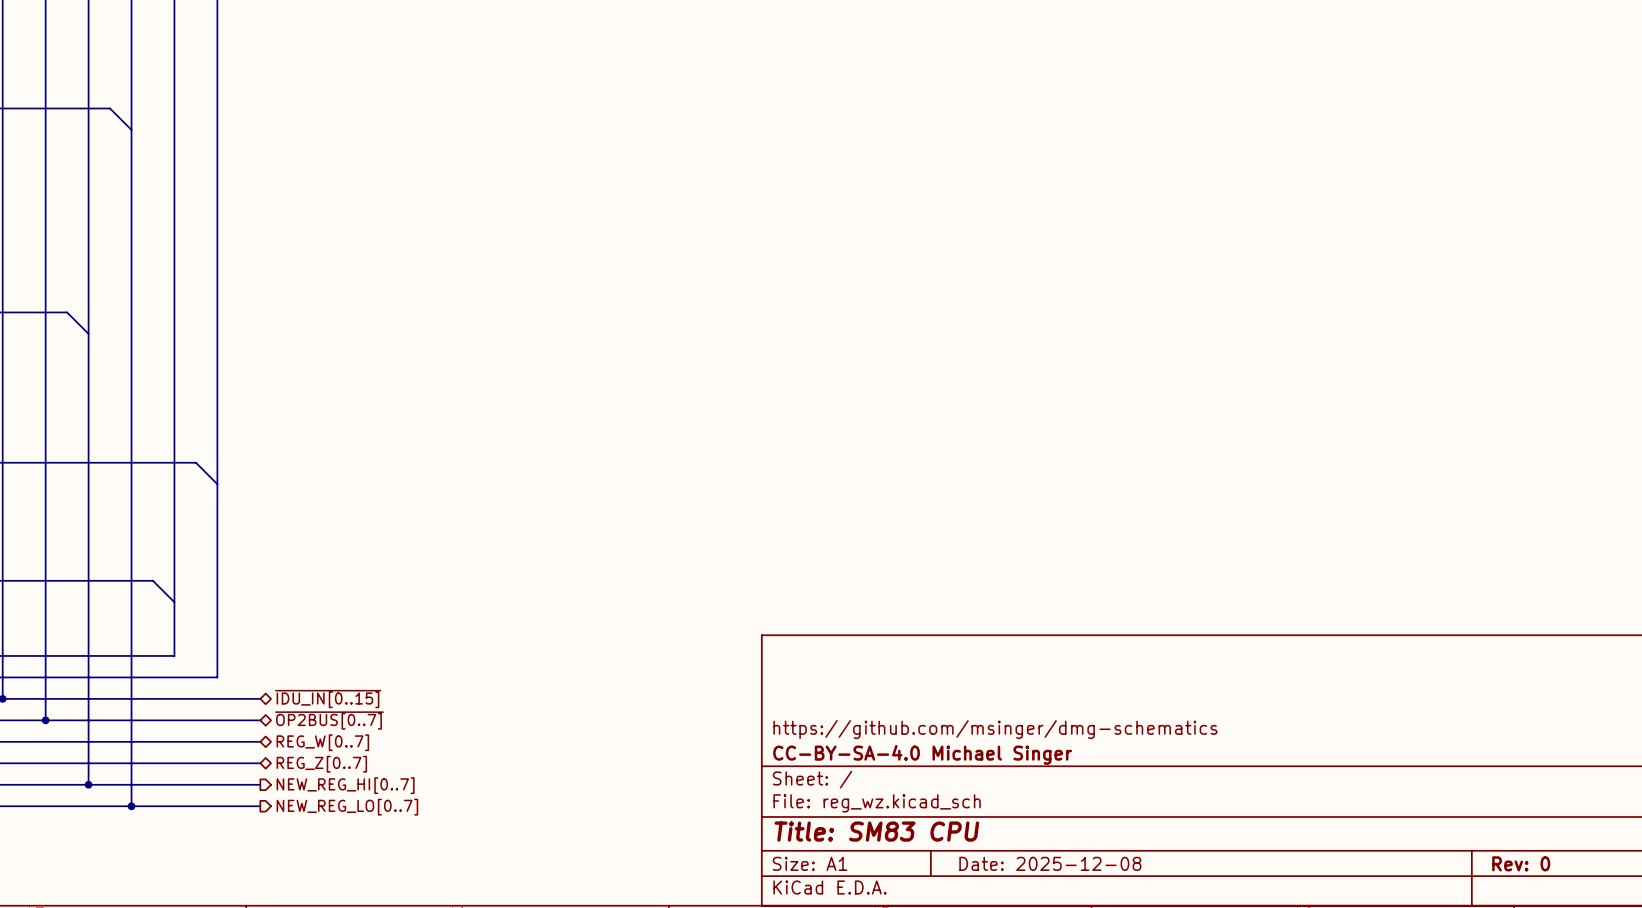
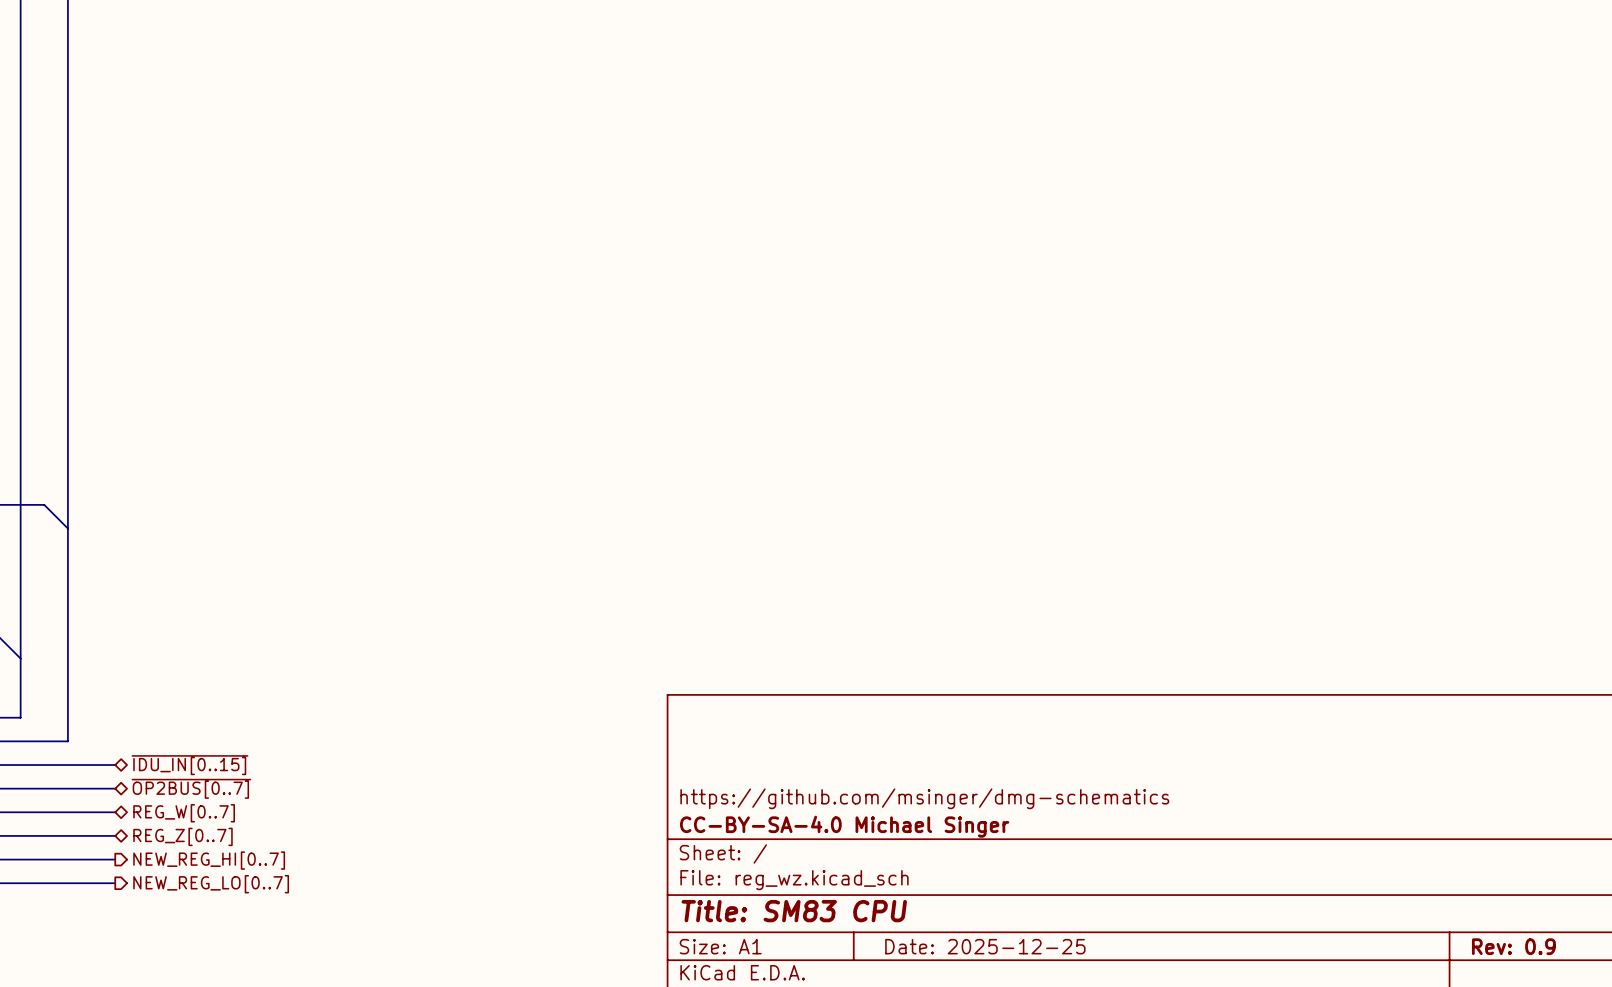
title block: Date: 2025-12-08 (1050, 863) -> Date: 2025-12-25 (985, 946)
title block: Rev: 0 (1521, 863) -> Rev: 0.9 (1513, 946)

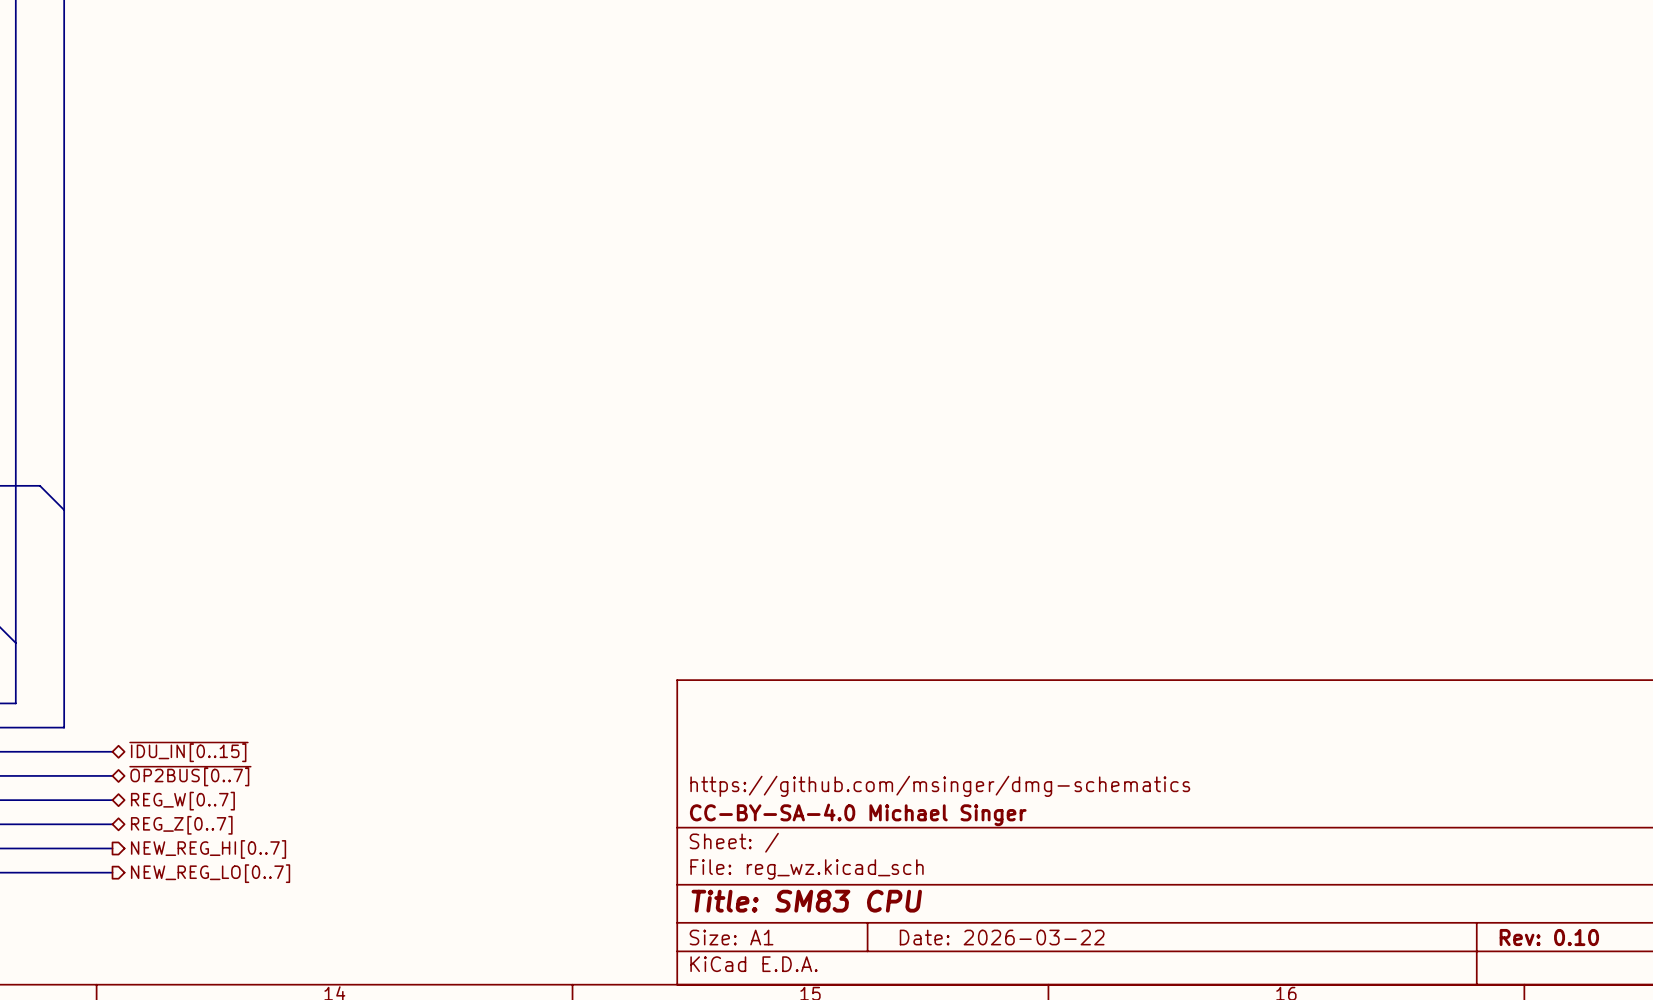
title block: Date: 2025-12-25 (985, 946) -> Date: 2026-03-22 (1002, 937)
title block: Rev: 0.9 (1513, 946) -> Rev: 0.10 (1549, 937)

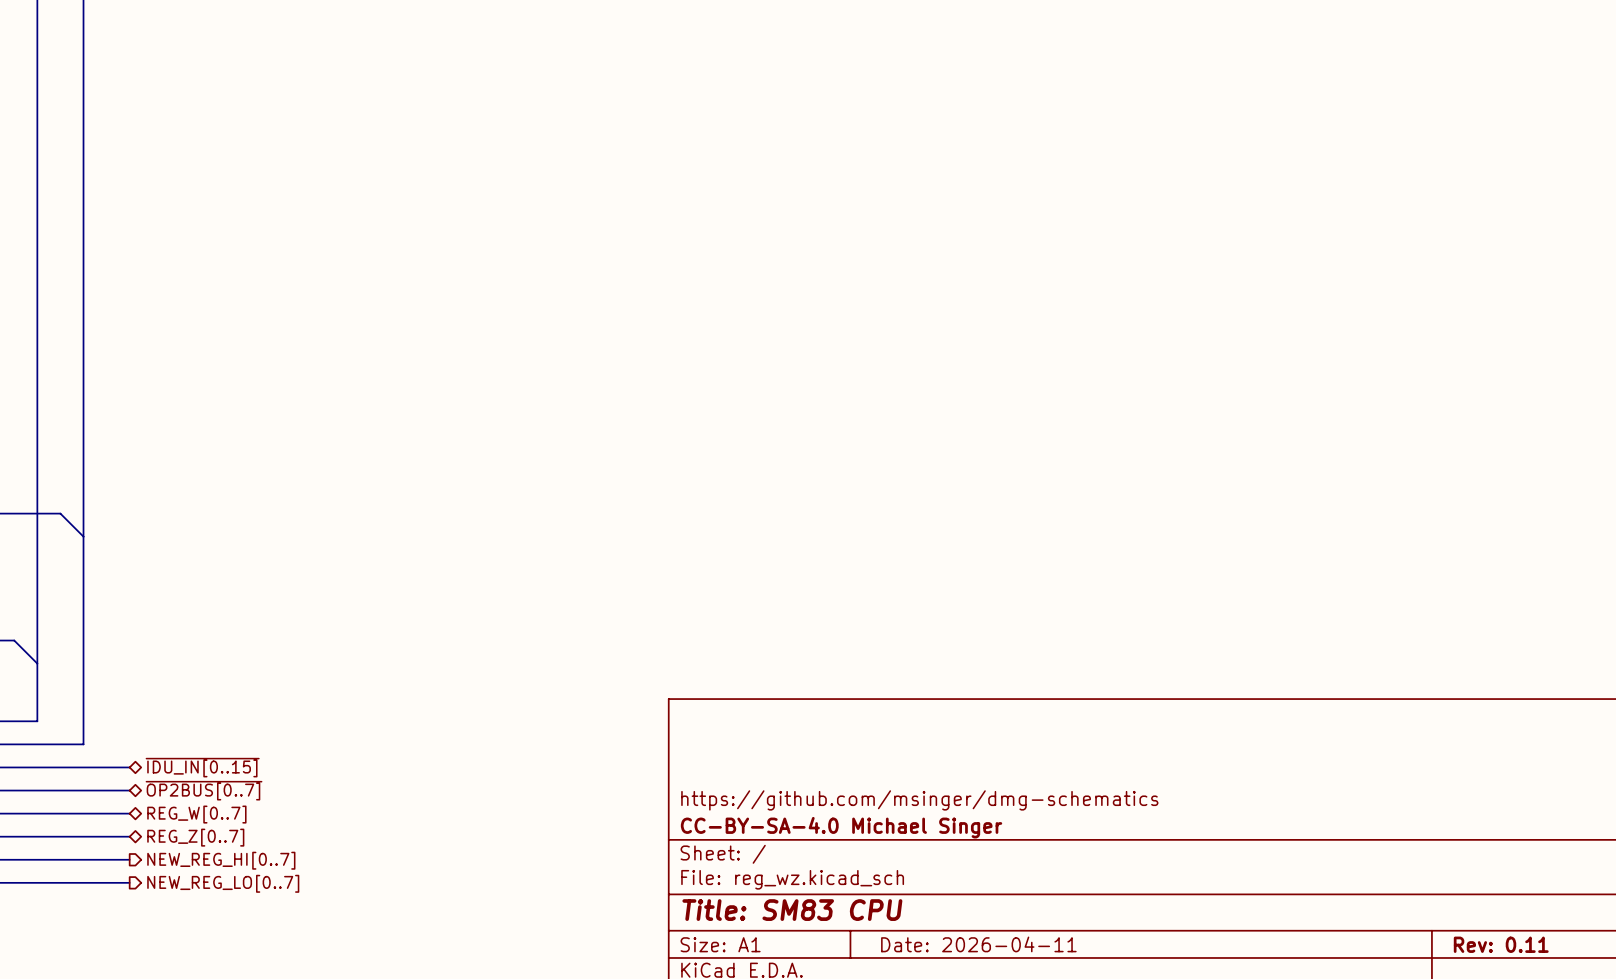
title block: Date: 2026-03-22 (1002, 937) -> Date: 2026-04-11 (978, 944)
title block: Rev: 0.10 (1549, 937) -> Rev: 0.11 (1501, 944)

